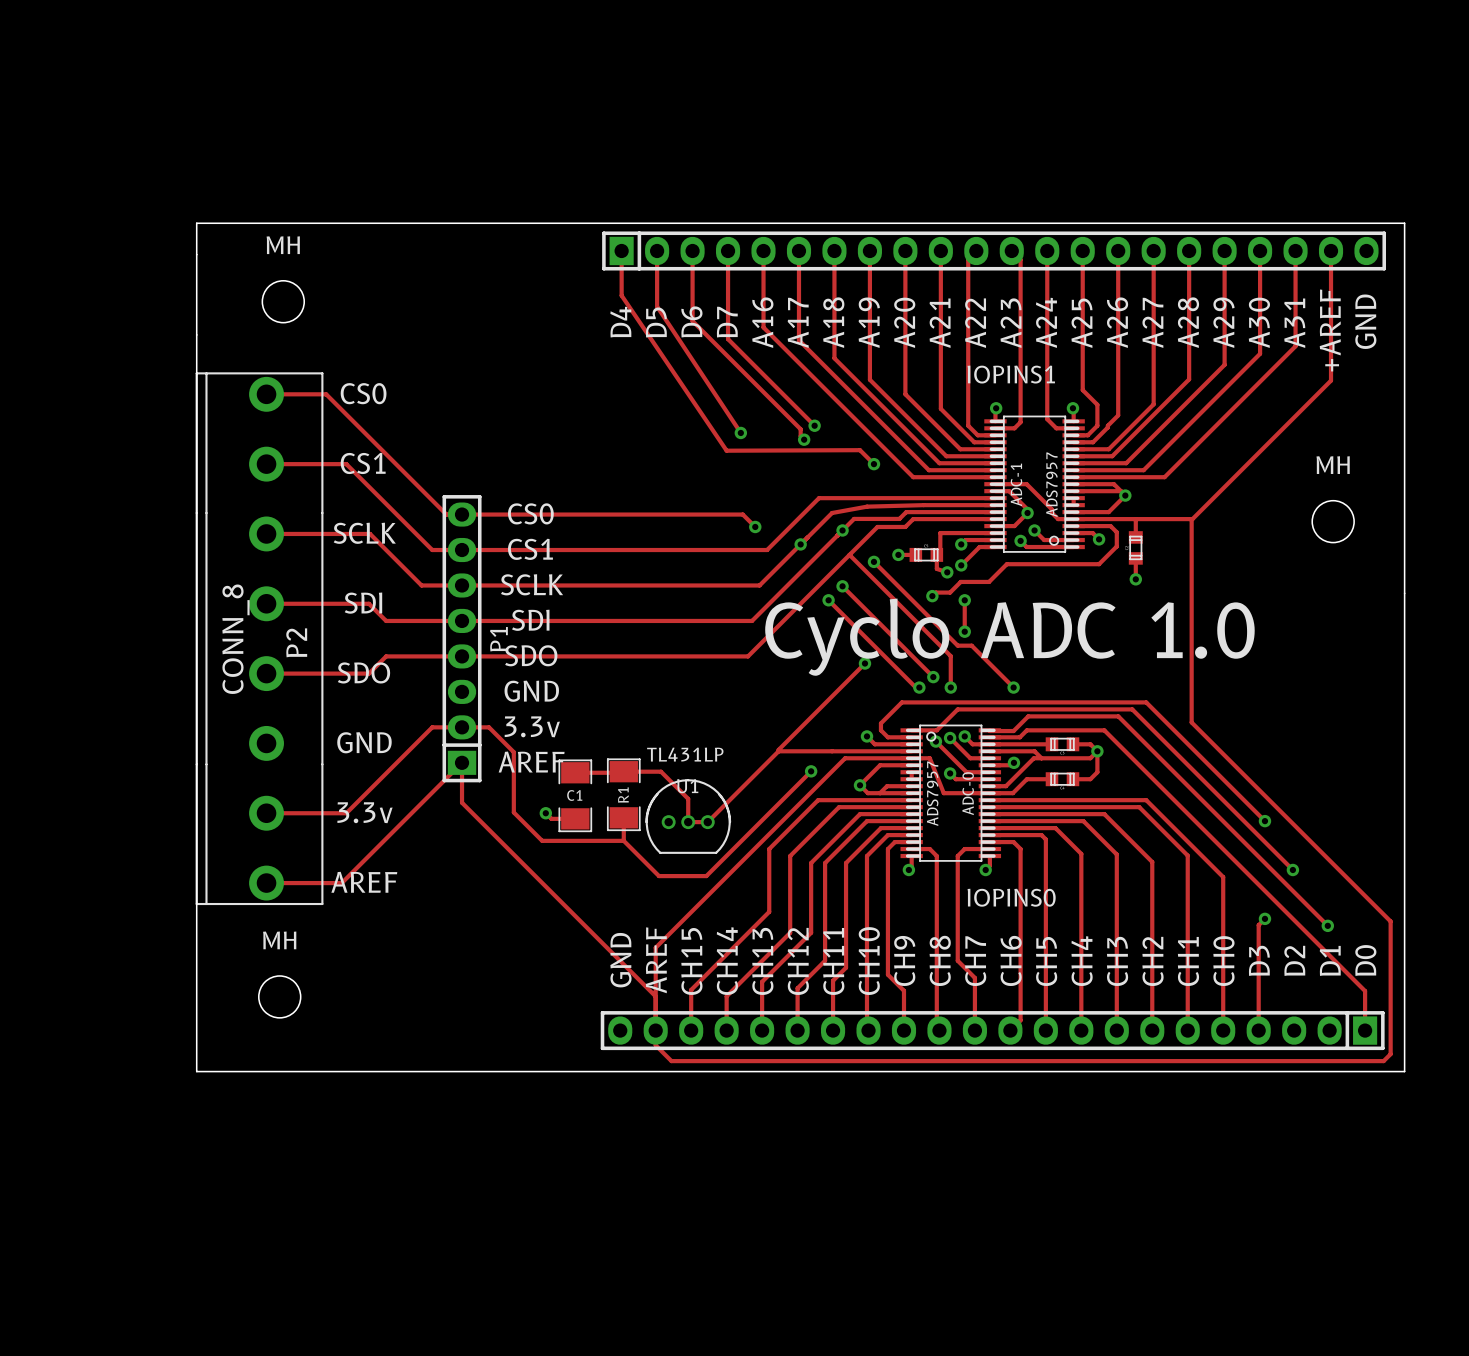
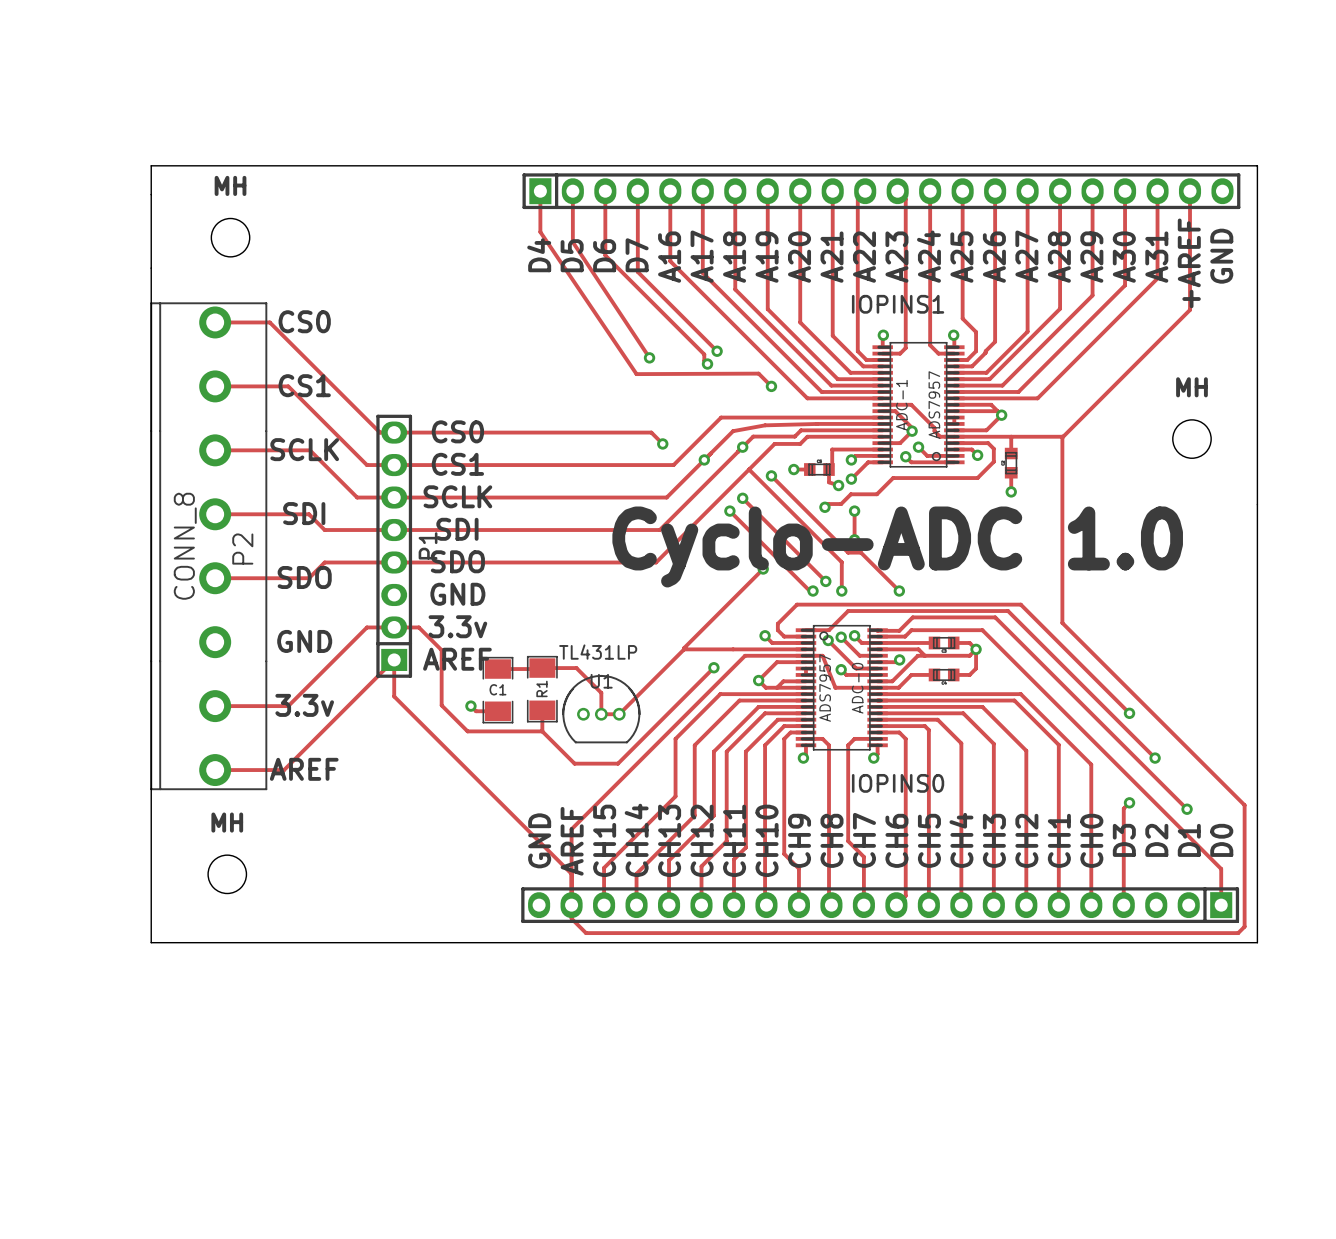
text: Cyclo ADC 1.0 (1009, 637) -> Cyclo-ADC 1.0 (897, 547)

